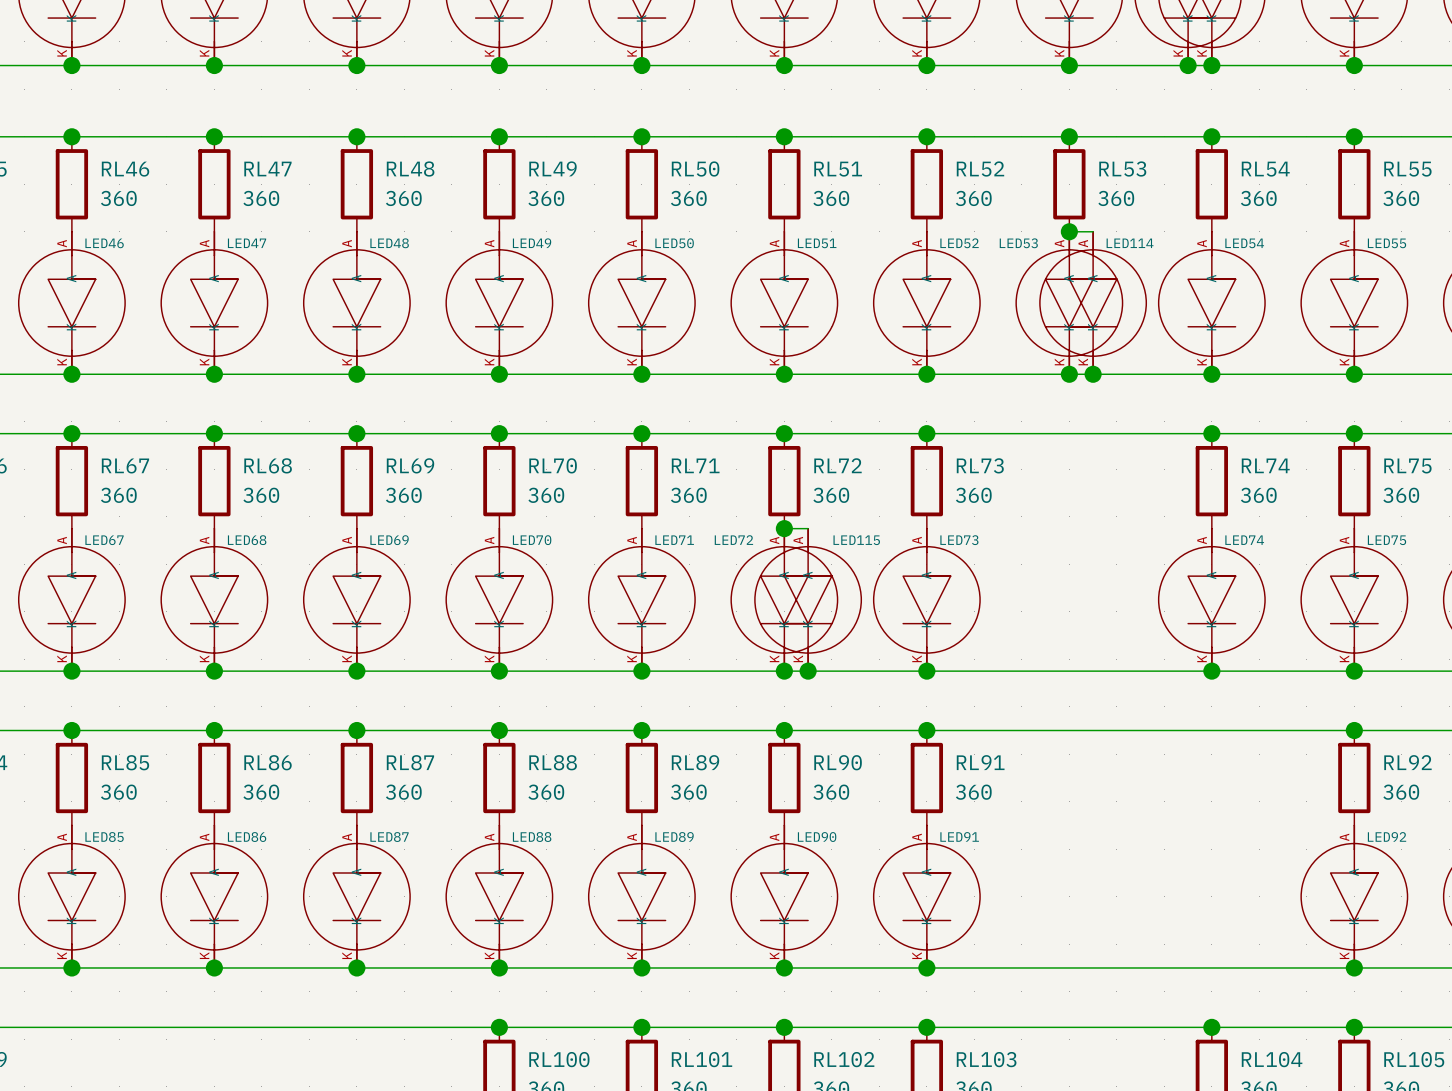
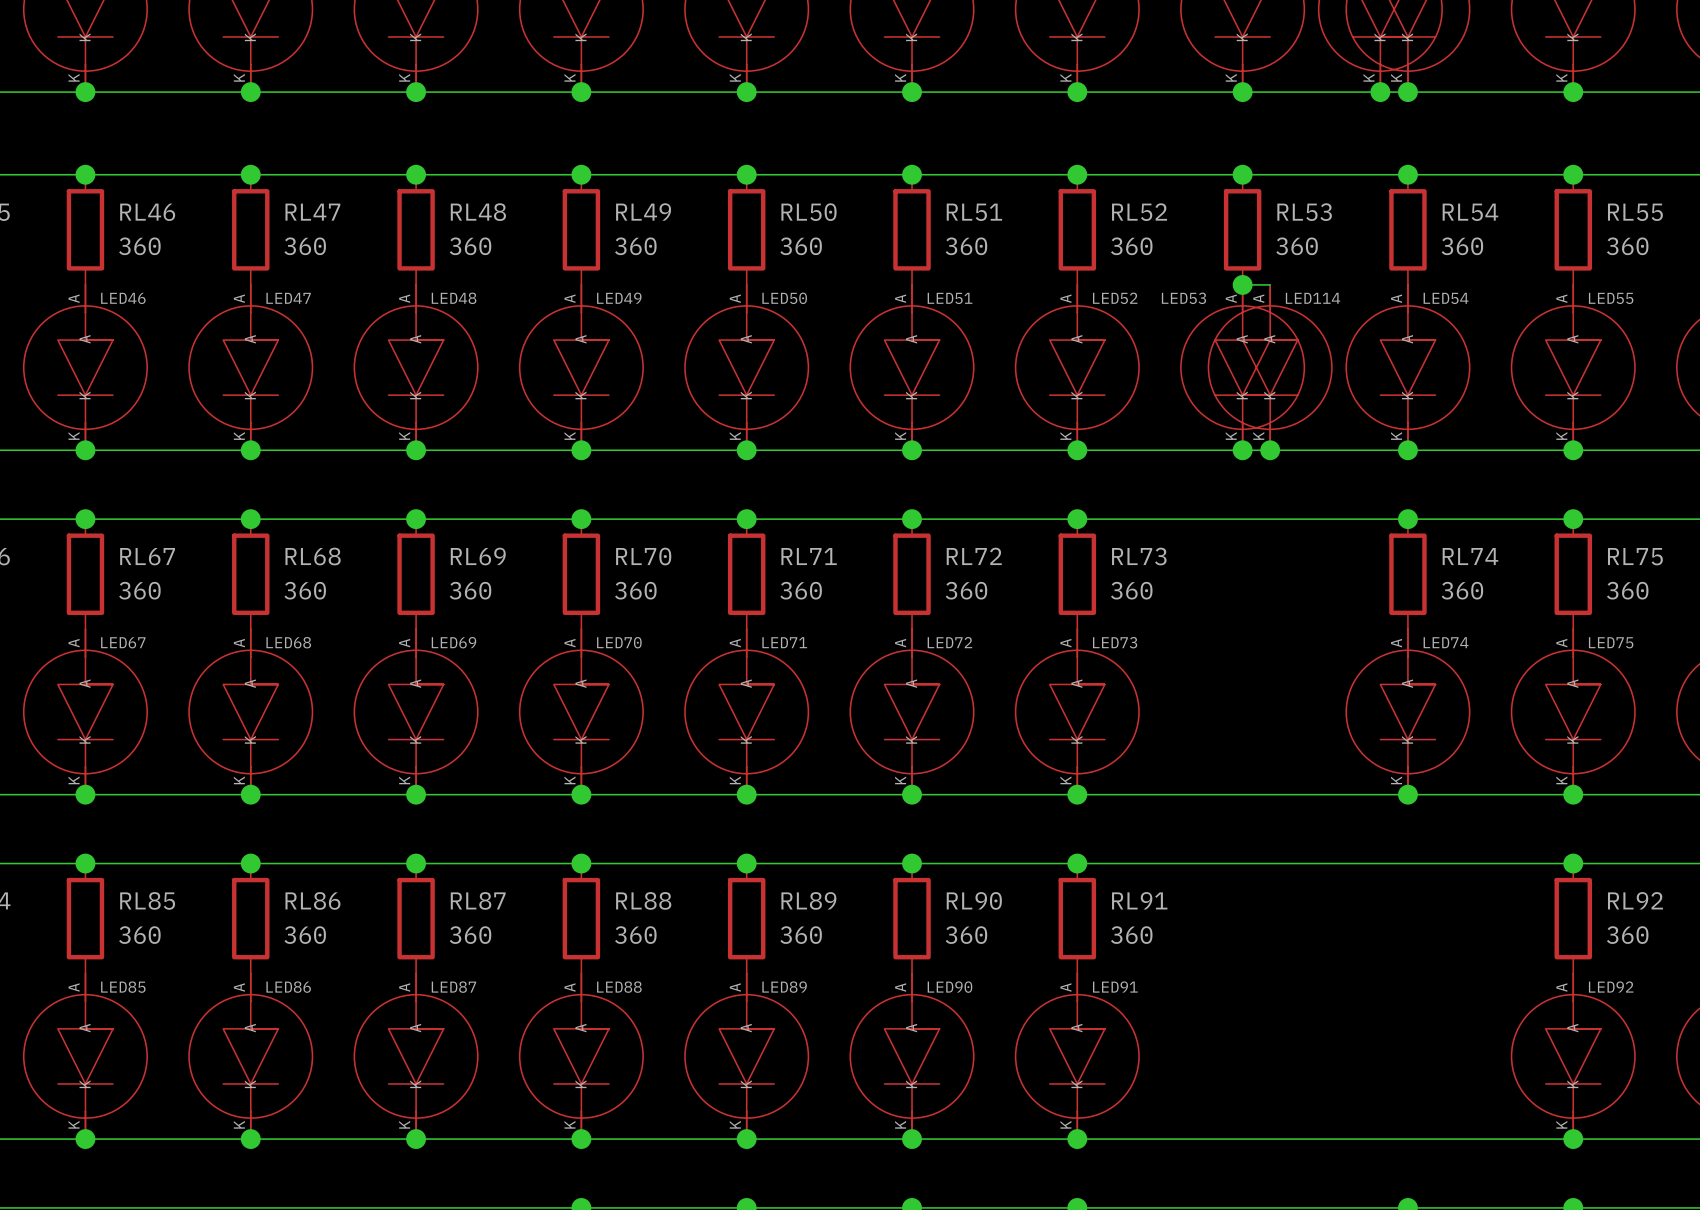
wire: (784, 528) (808, 528) -> none
junction: (784, 528) -> none
LED72 name position: LED72 (733, 540) -> LED72 (949, 642)
LED115: (808, 599) -> none
junction: (808, 671) -> none

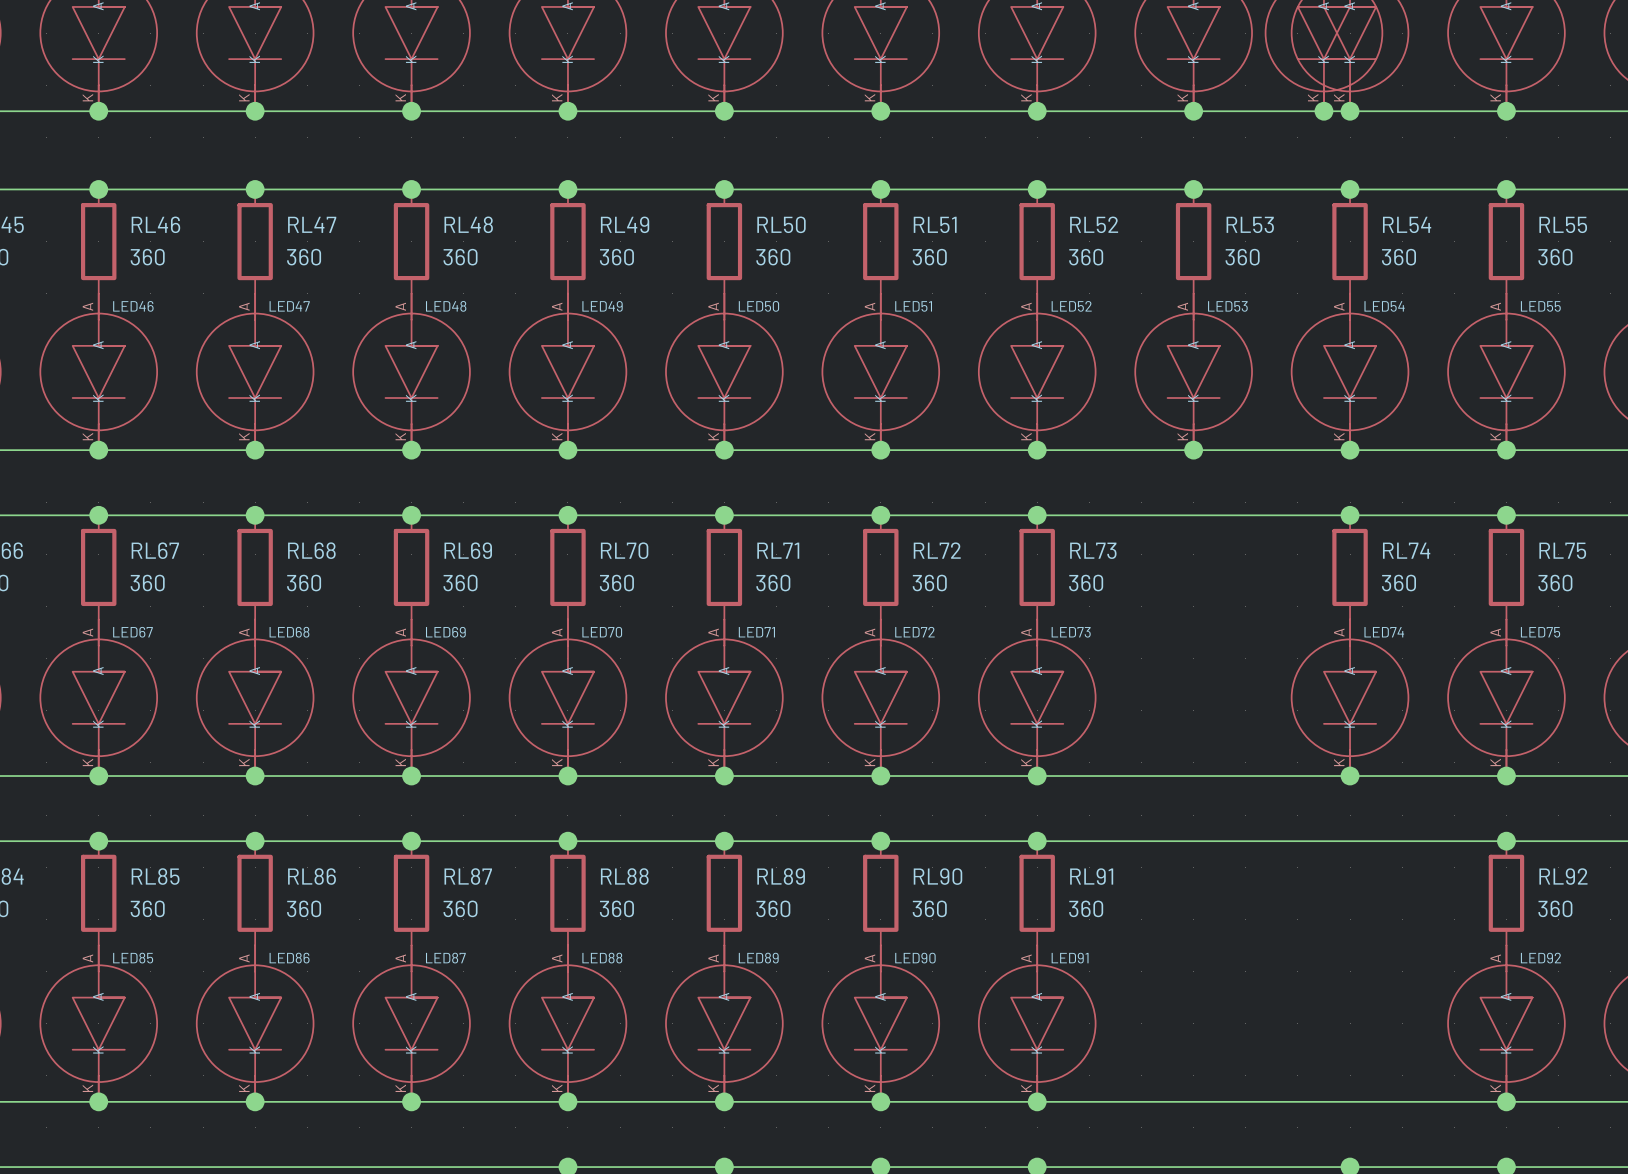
wire: (1242, 284) (1270, 284) -> none
junction: (1242, 284) -> none
LED53 name position: LED53 (1183, 298) -> LED53 (1227, 306)
LED114: (1270, 367) -> none
junction: (1270, 450) -> none

